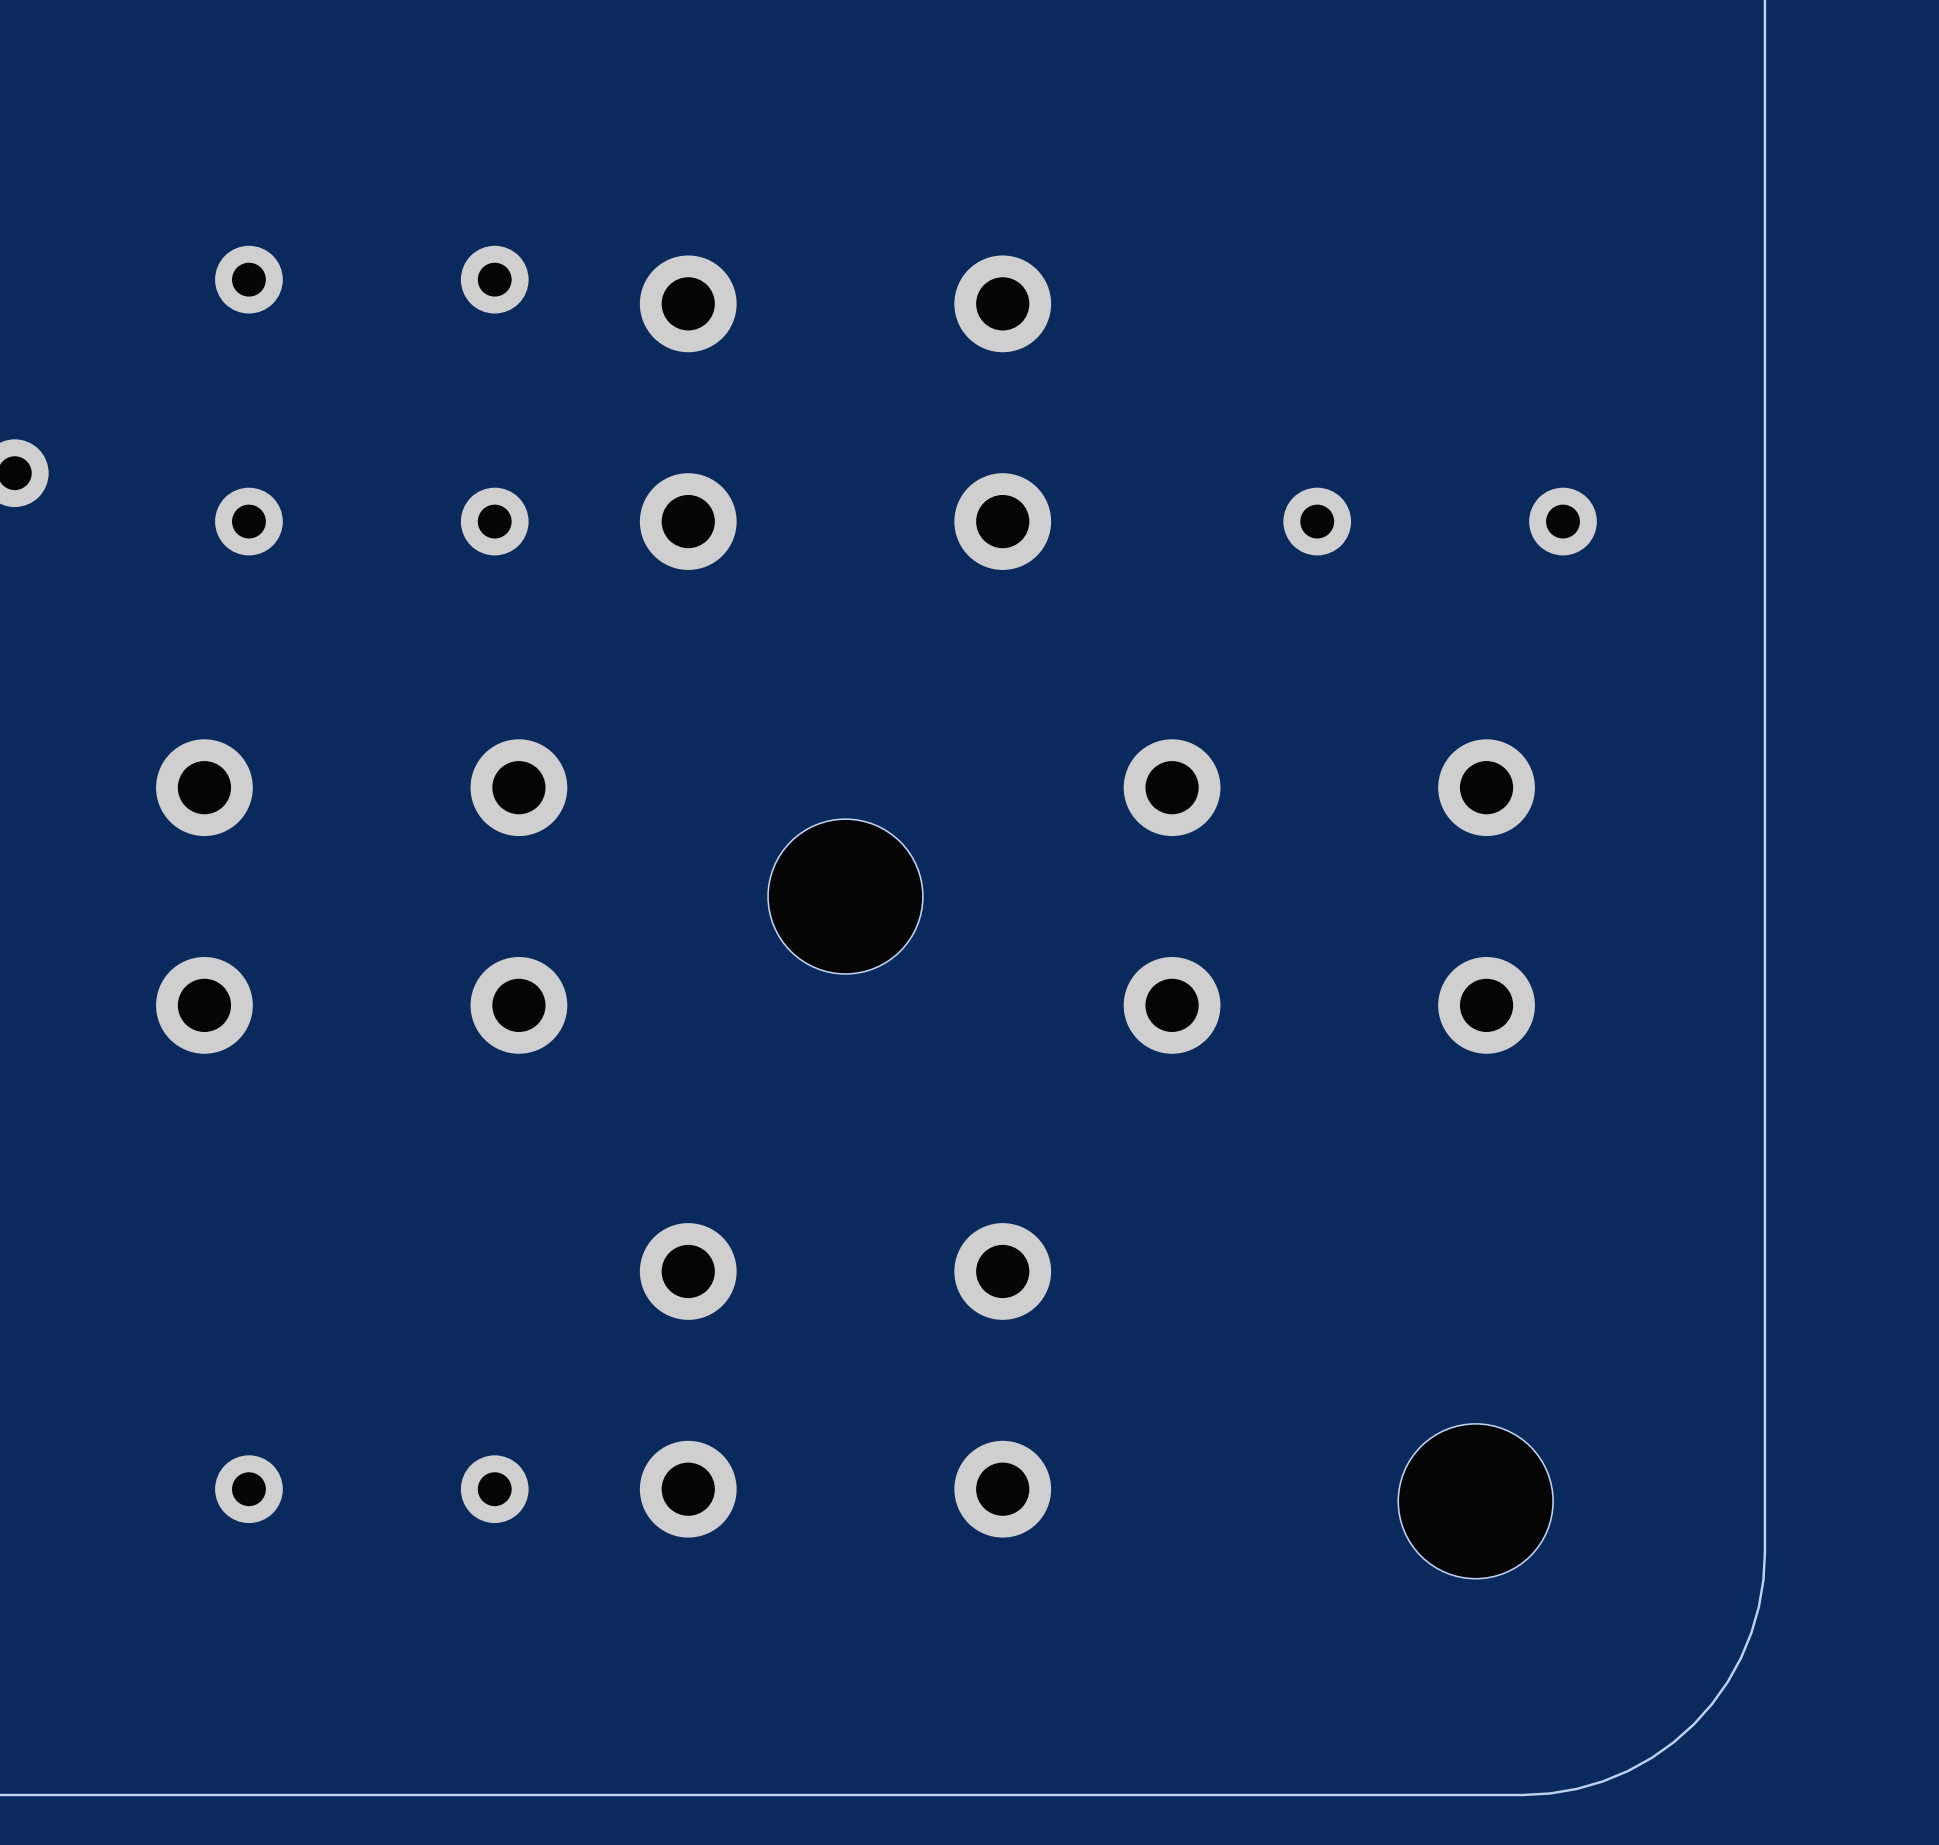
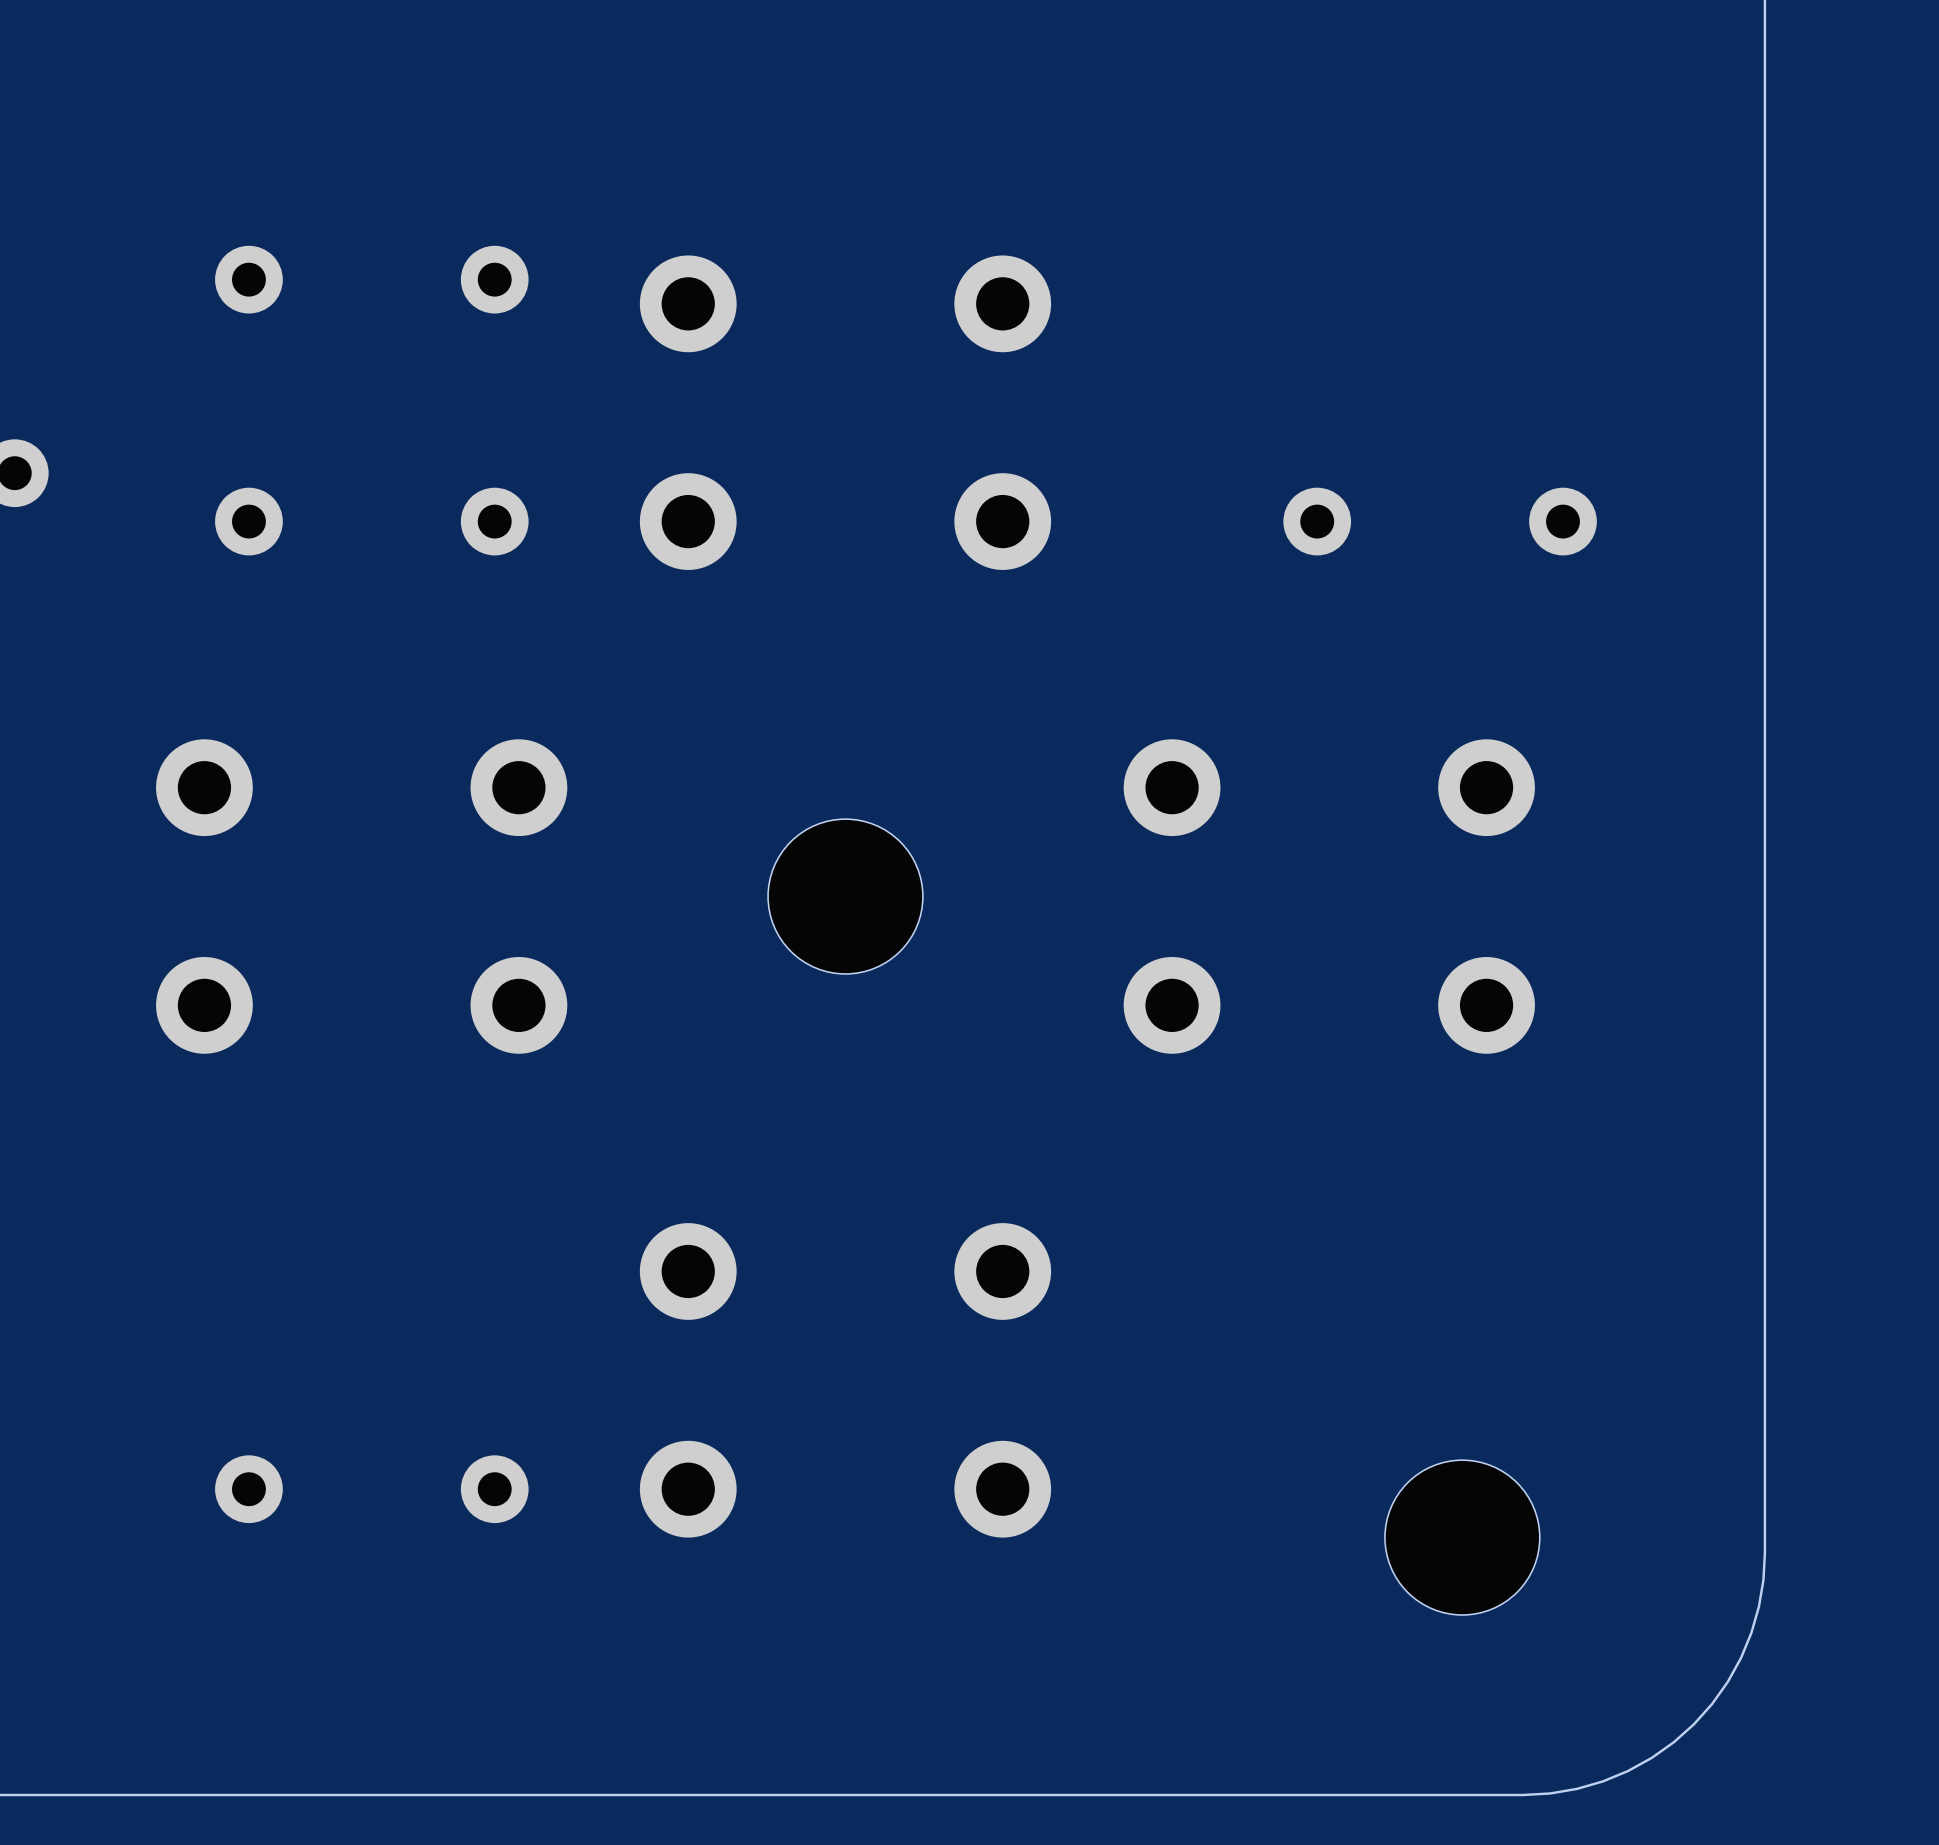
part position: (1475, 1501) -> (1462, 1537)

